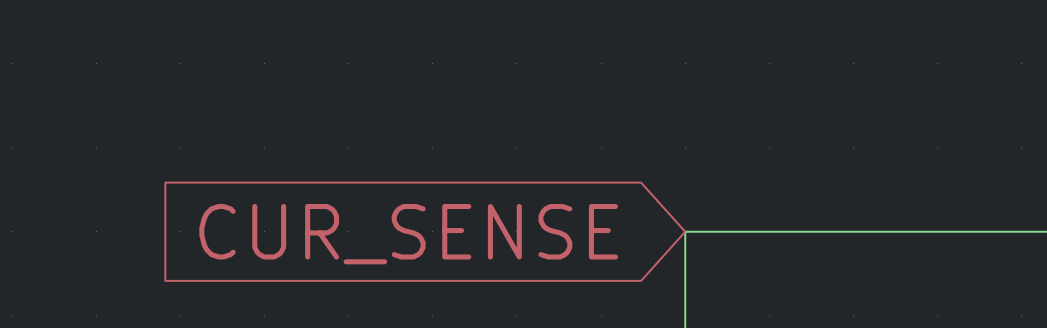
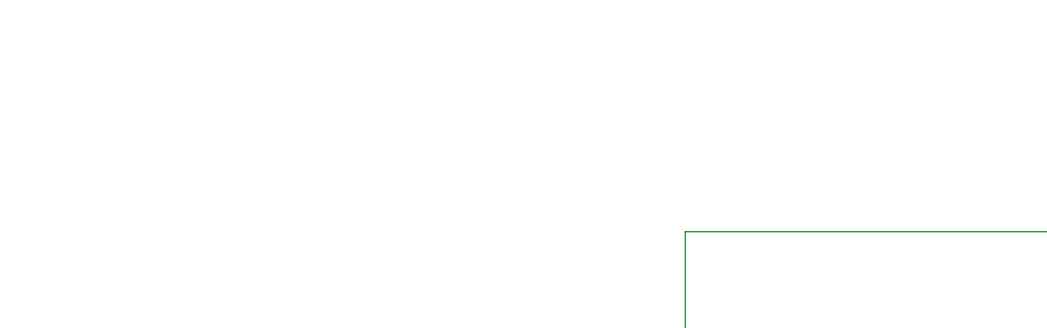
global label: CUR_SENSE (408, 234) -> none

